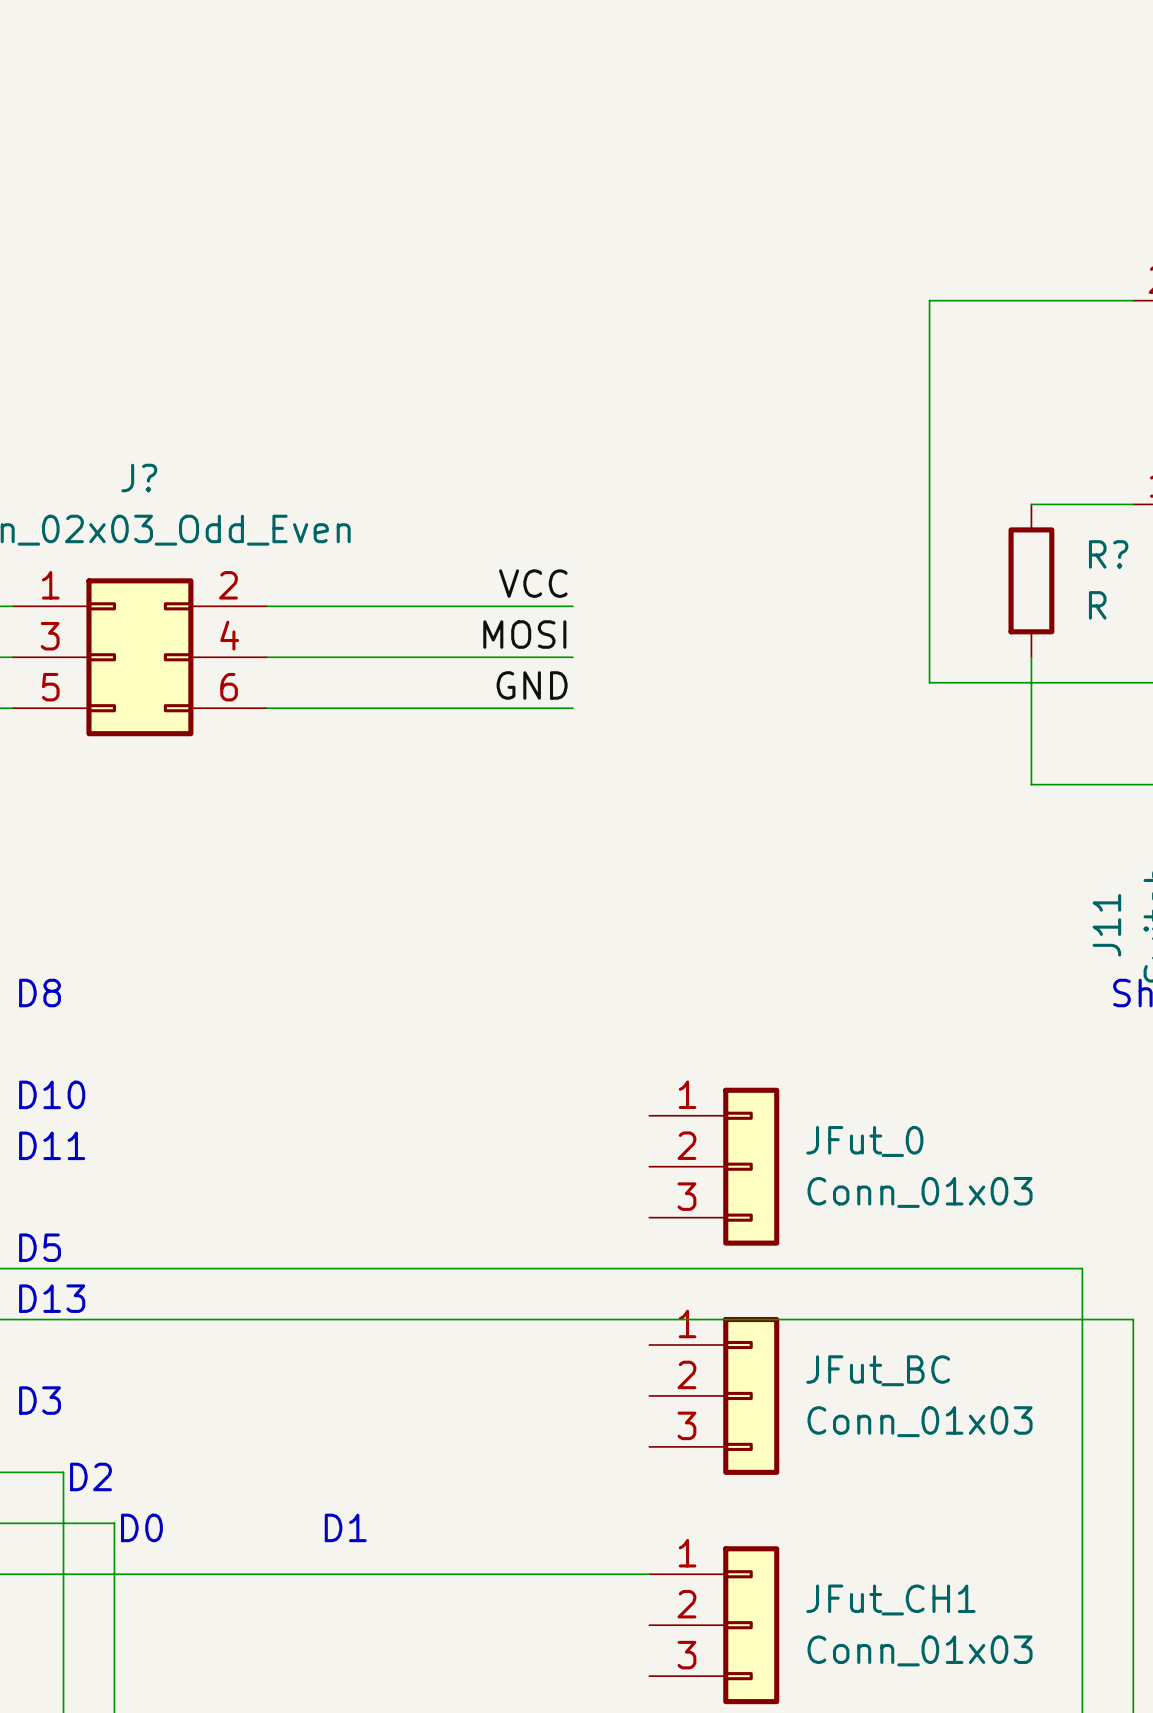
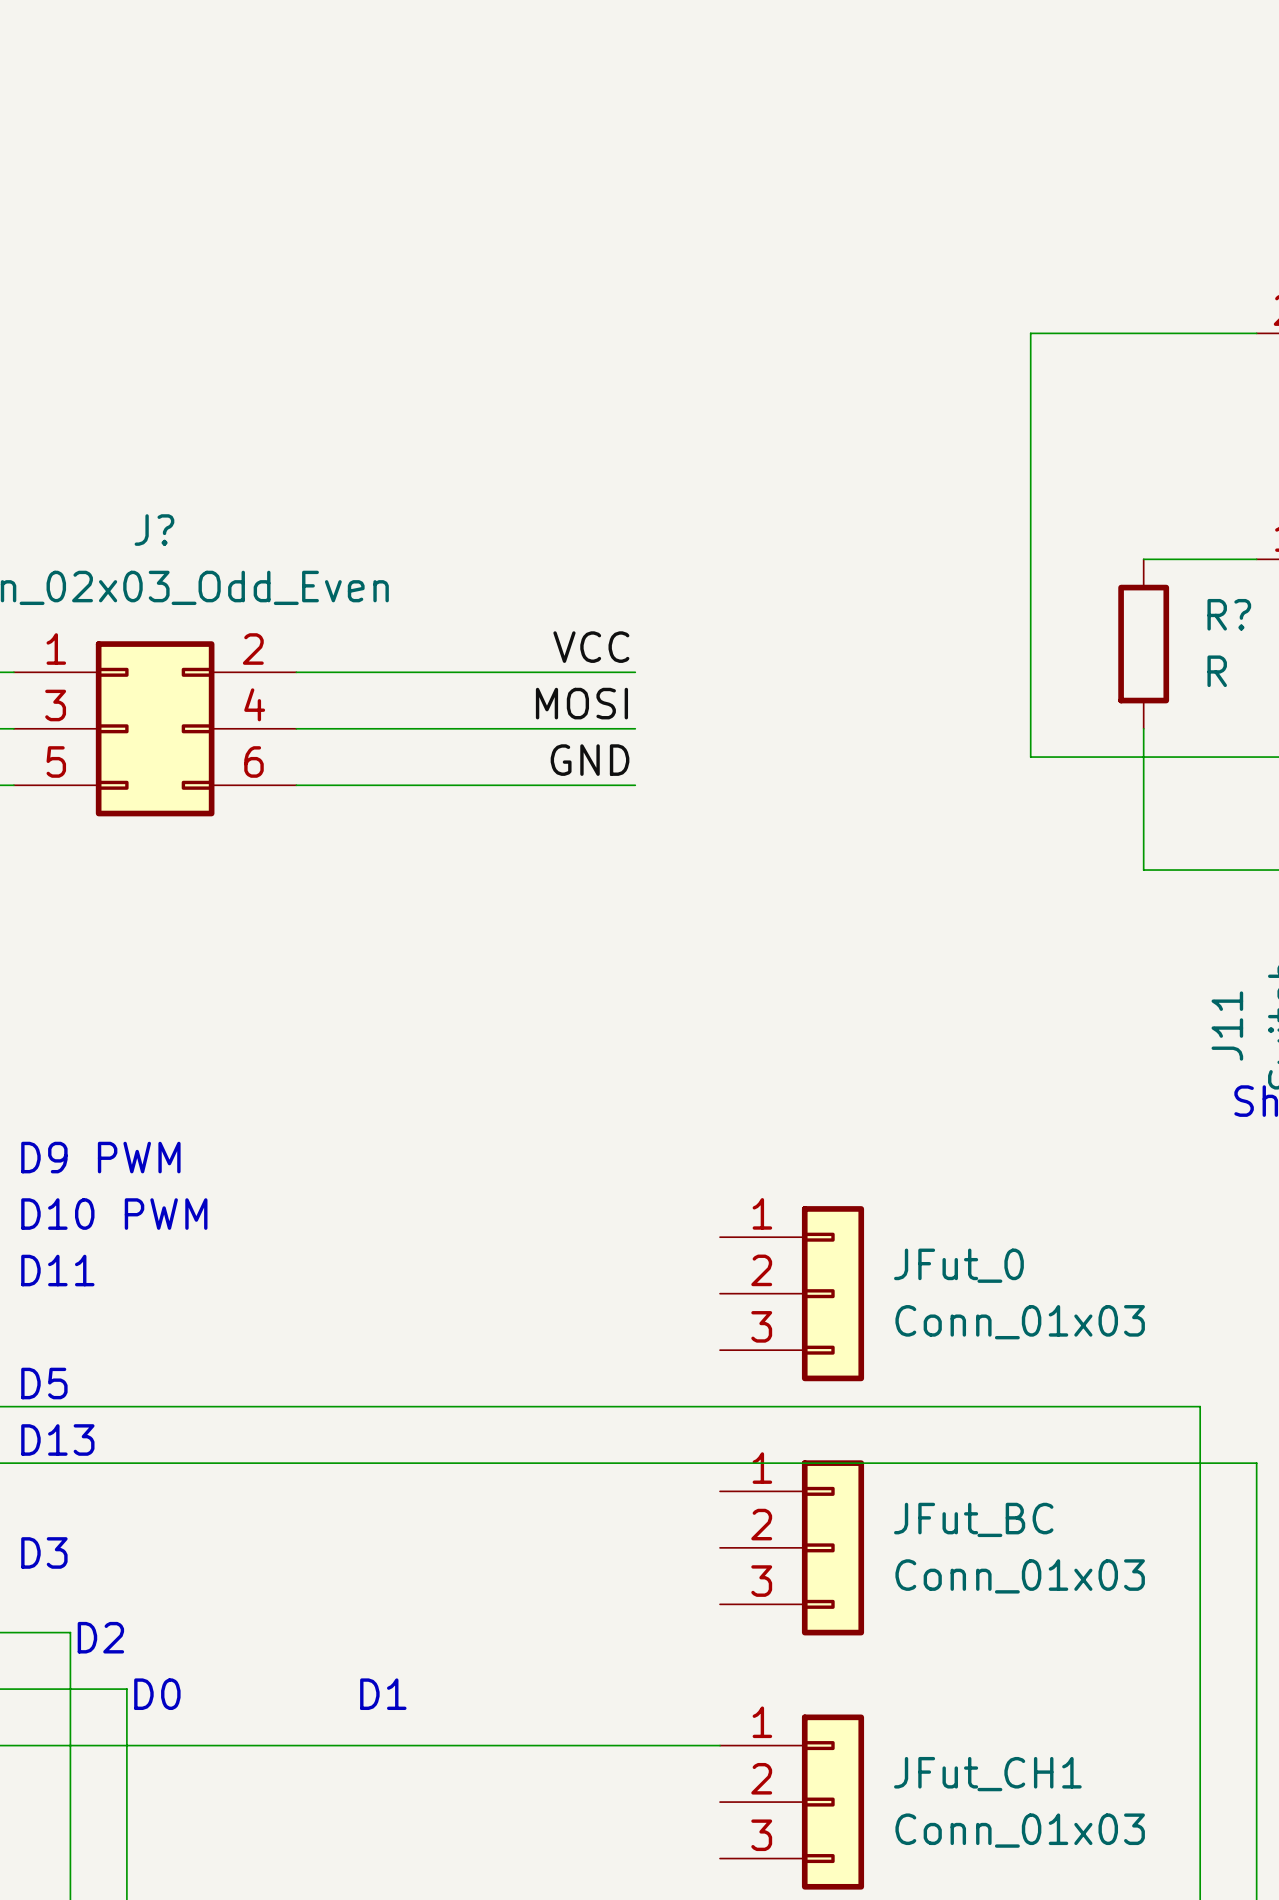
text: D8 (40, 993) -> none
text: none -> D9 PWM (100, 1157)
text: D10 (52, 1094) -> D10 PWM (114, 1214)

